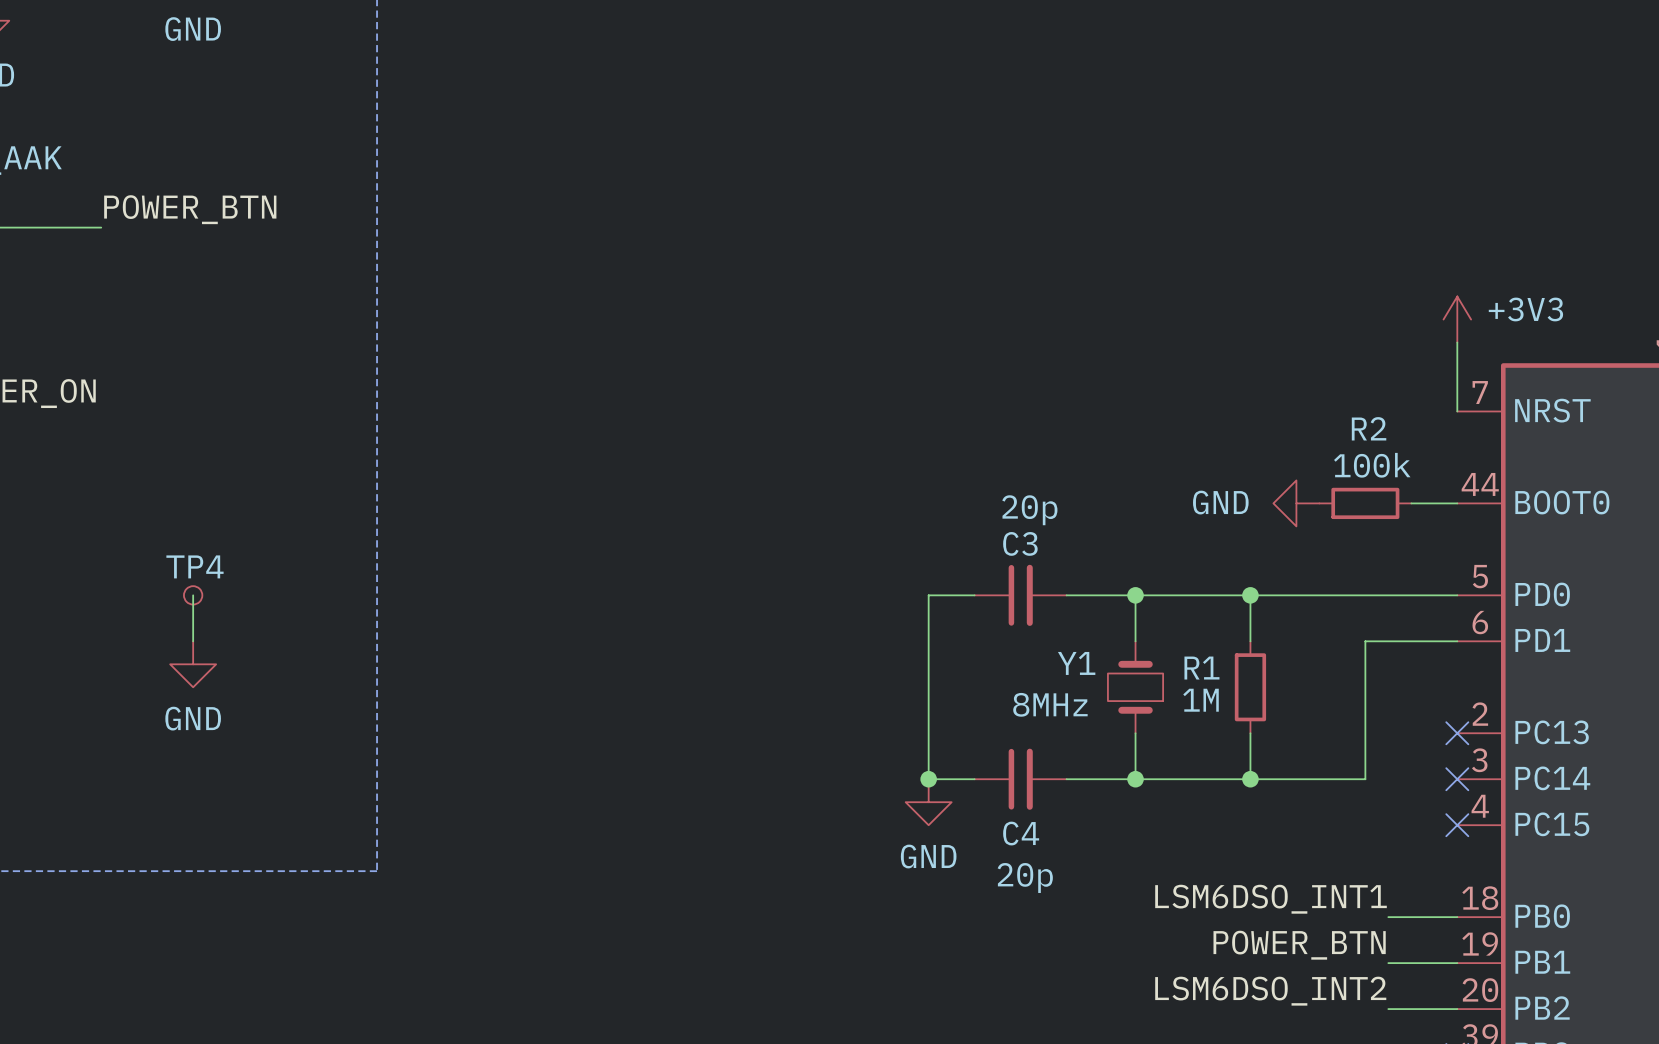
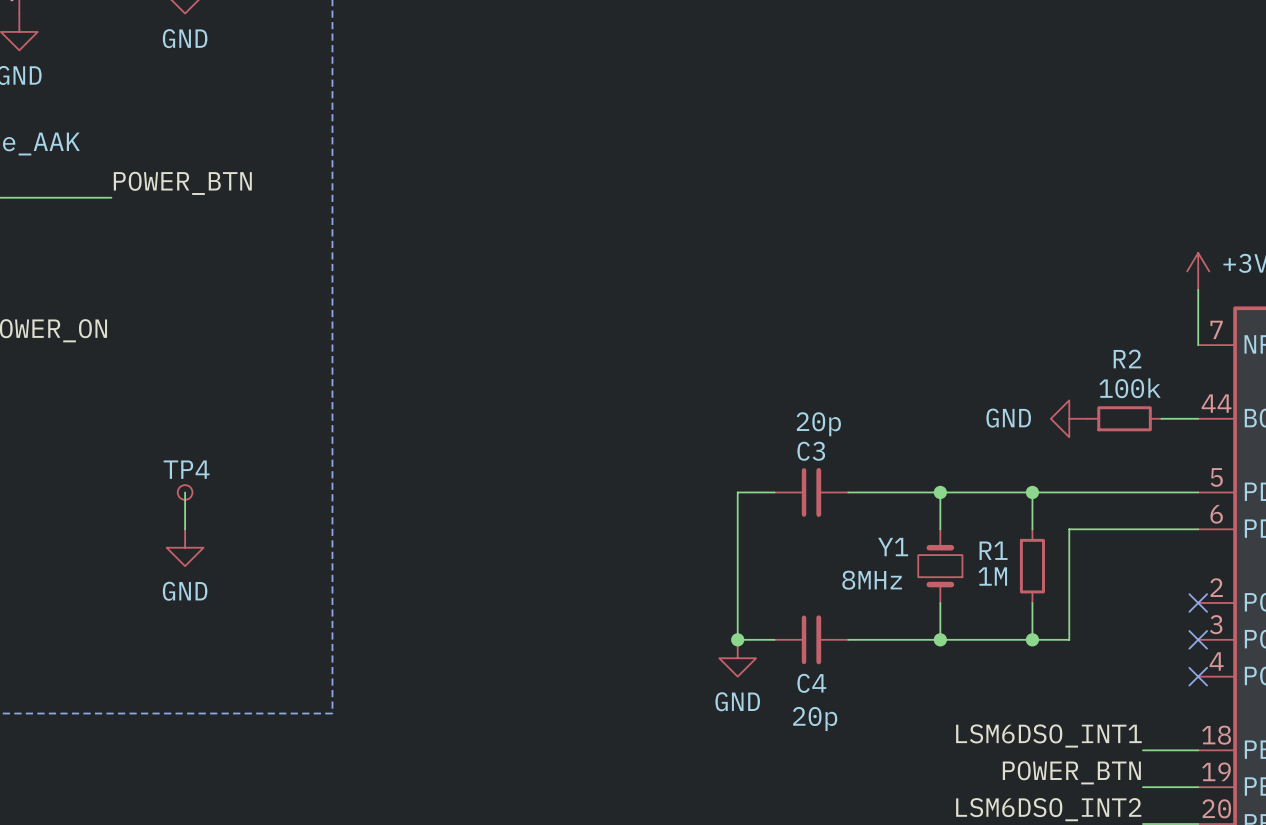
wire: (974, 595) (928, 595) (928, 779) (974, 779) -> (774, 492) (737, 492) (737, 639) (774, 639)
C3 position: (1020, 595) -> (811, 492)
wire: (1365, 641) (1365, 779) (1296, 779) -> (1124, 529) (1069, 529) (1069, 639)
junction position: (928, 779) -> (737, 639)
C4 position: (1020, 779) -> (811, 639)
power symbol position: GND (928, 802) -> GND (737, 658)

